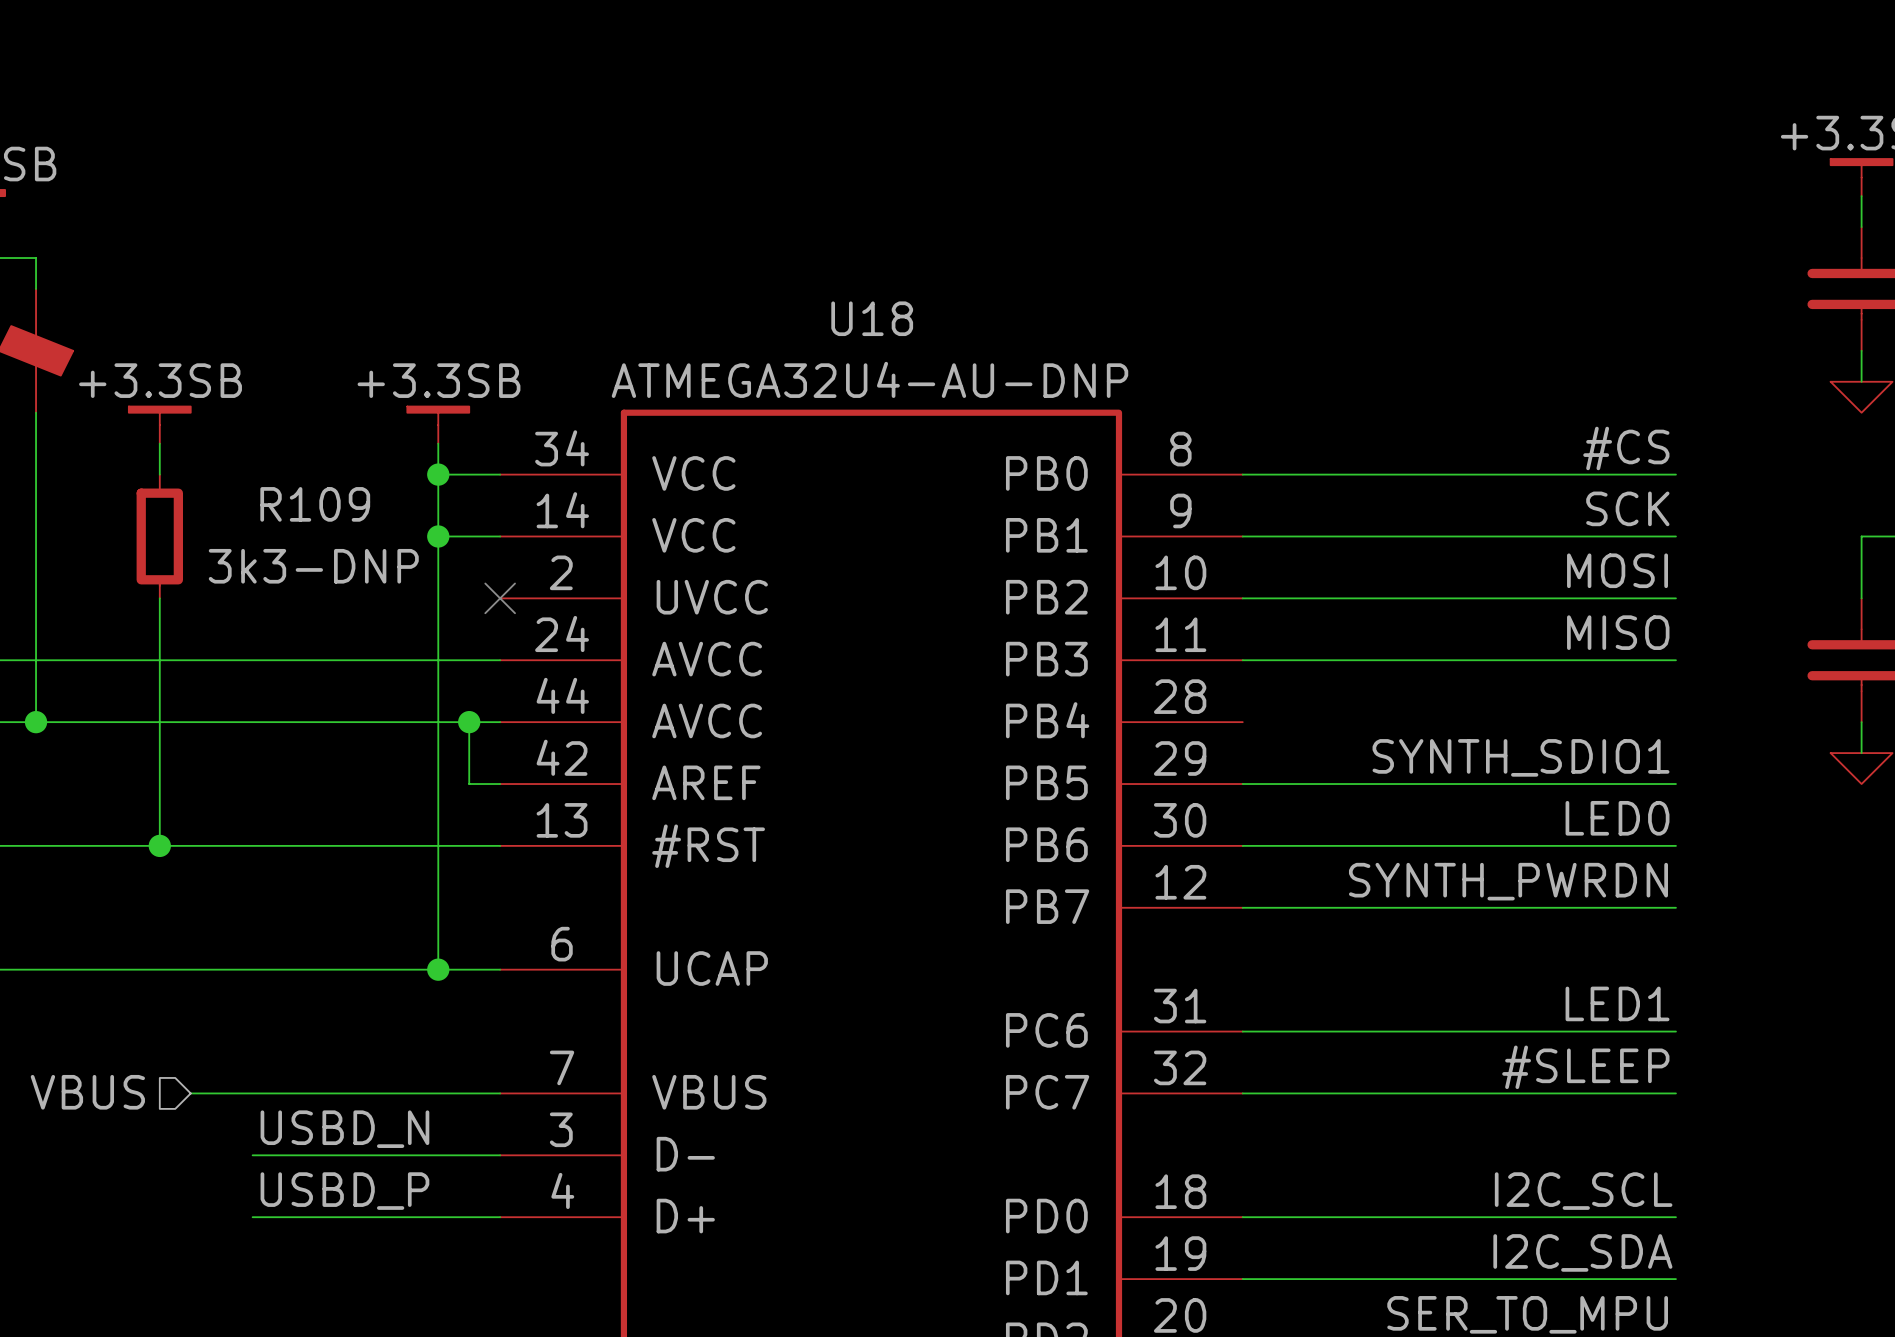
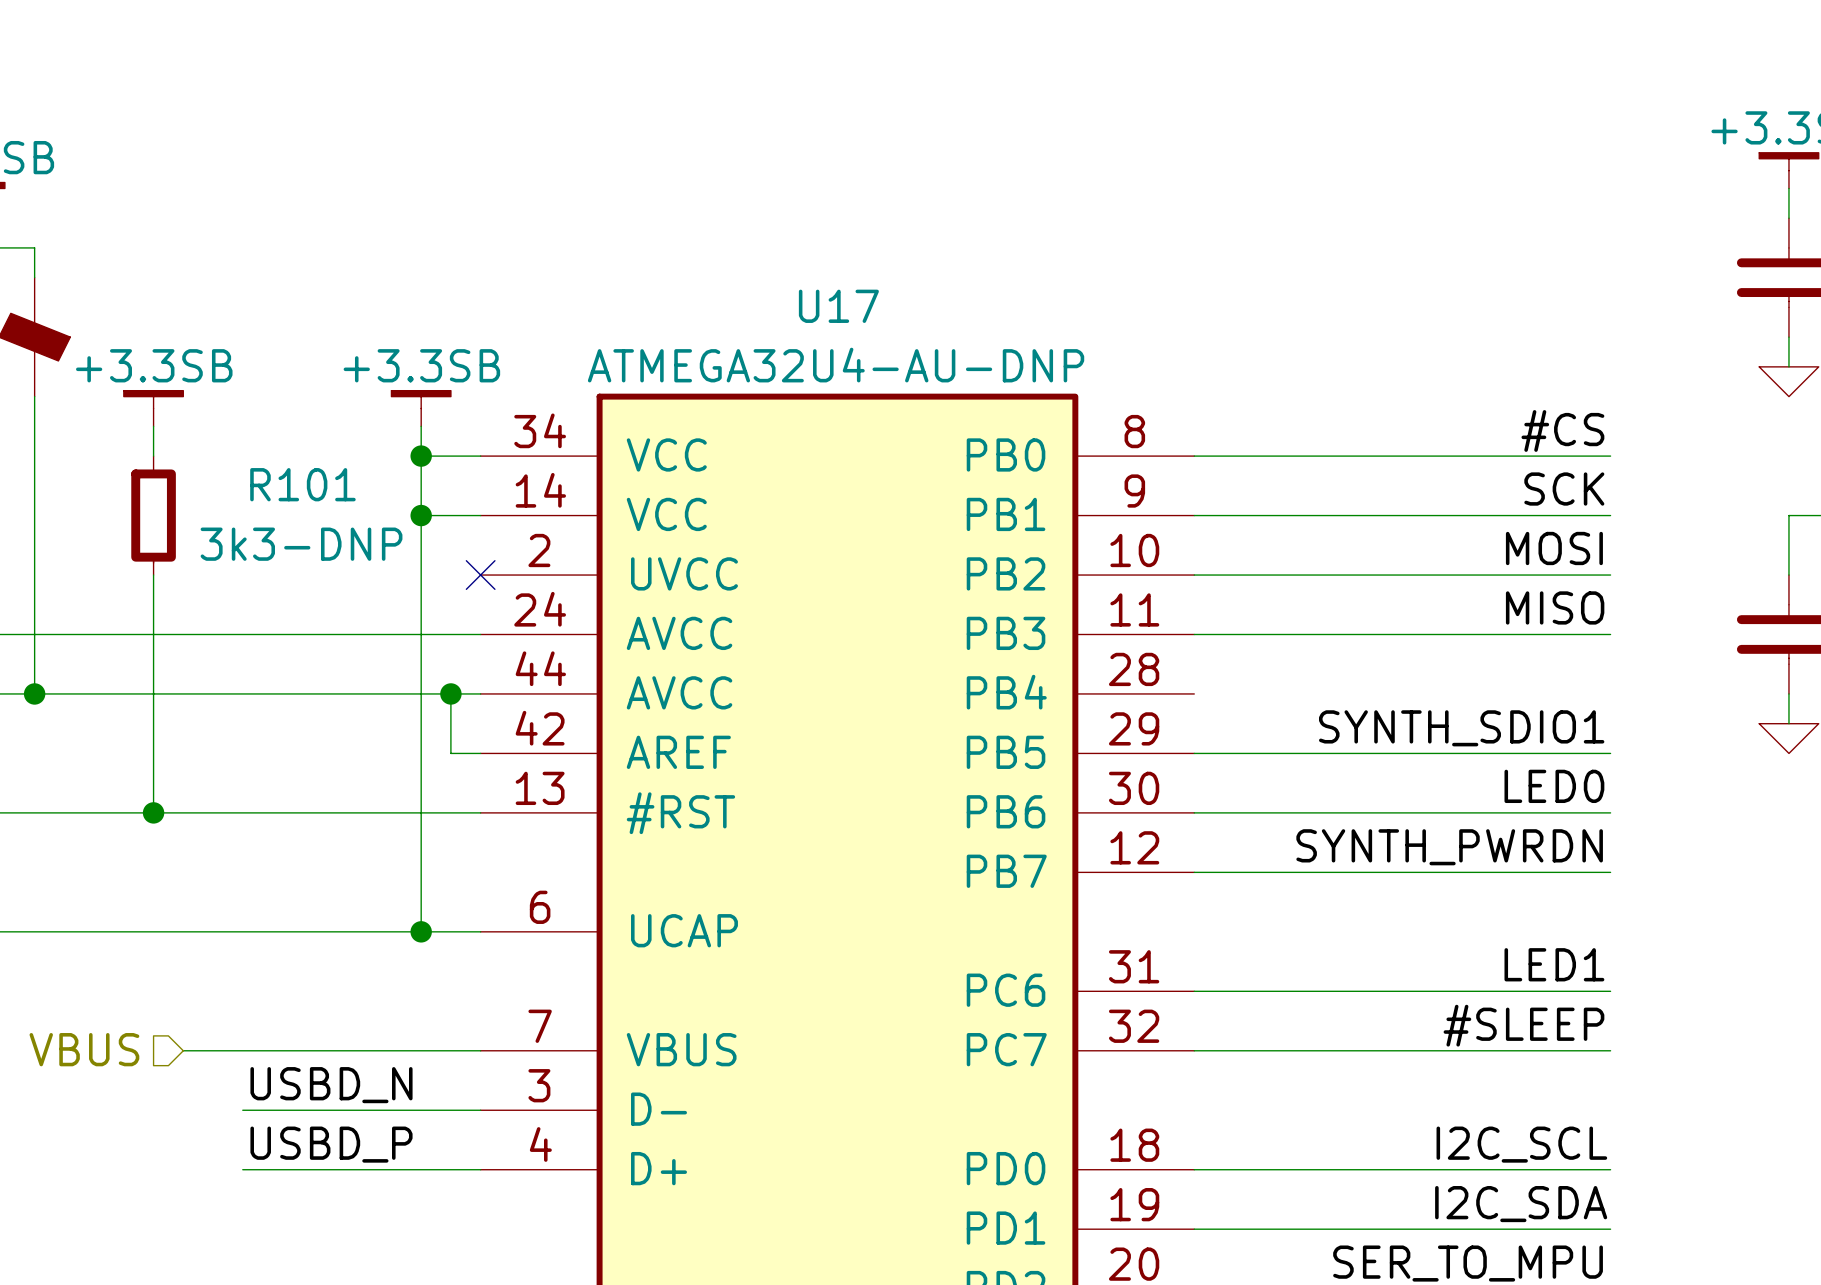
U18 name: U18 (872, 318) -> U17 (838, 306)
R109 name: R109 (315, 504) -> R101 (302, 484)

